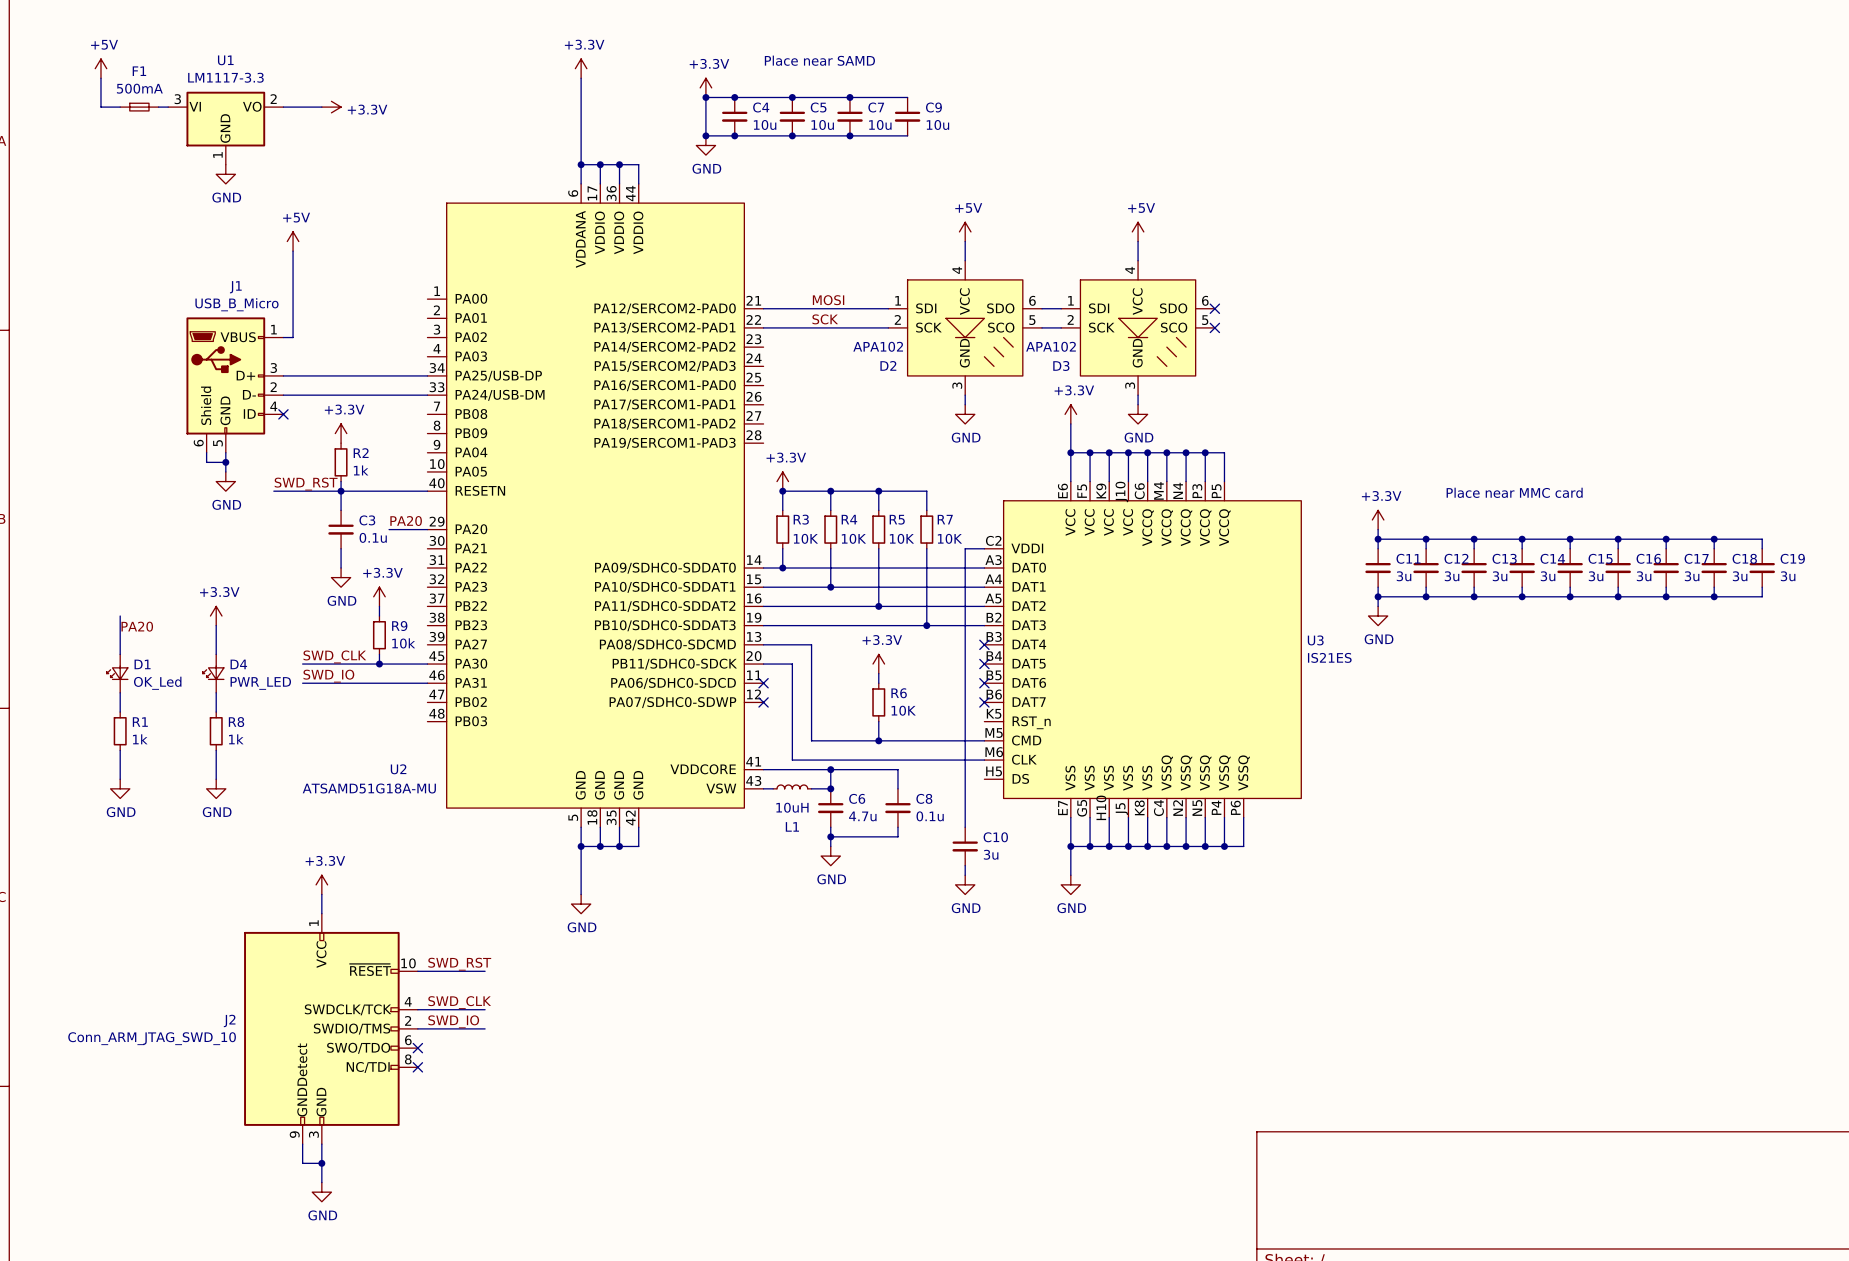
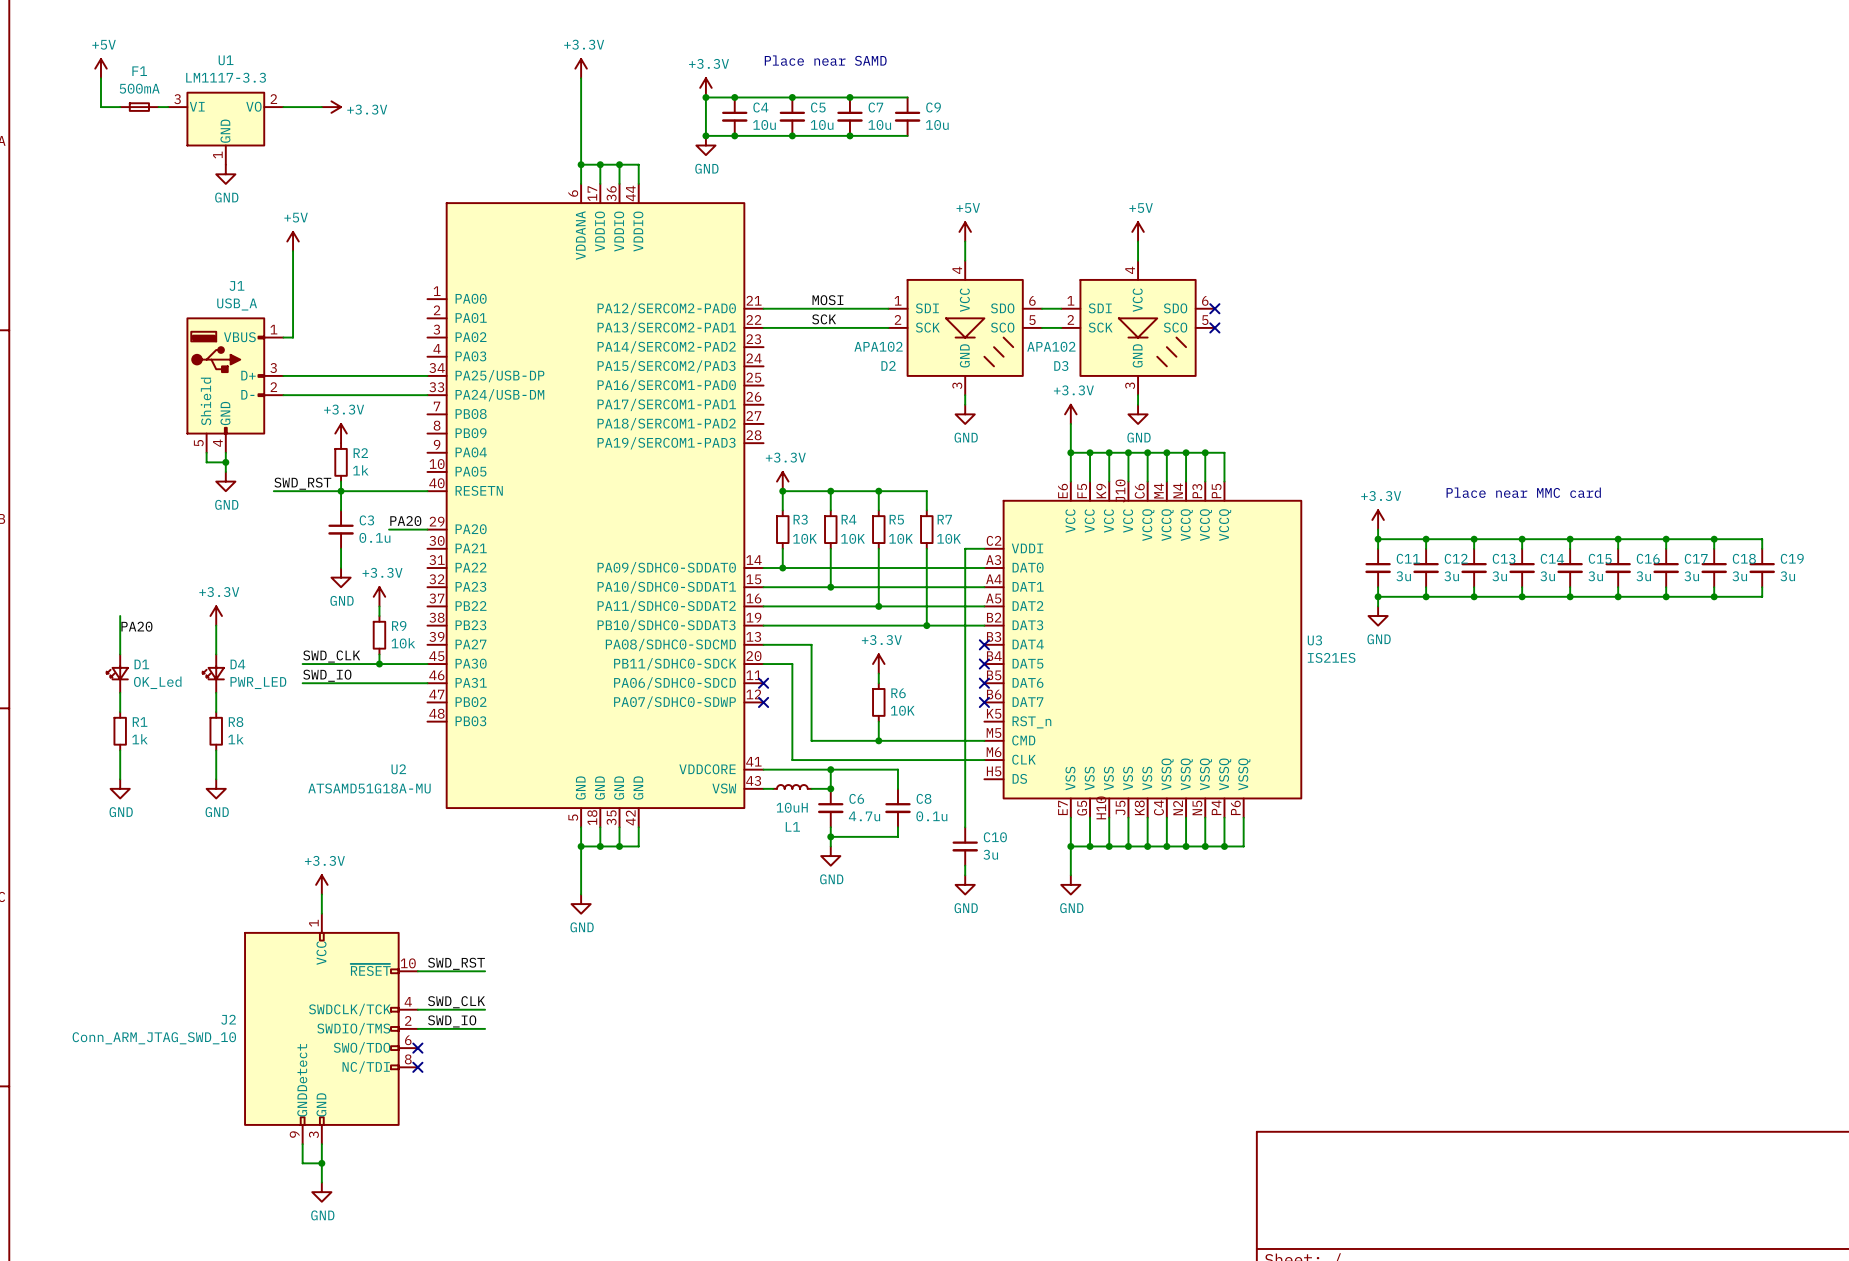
J1 value: USB_B_Micro (236, 304) -> USB_A (237, 304)
J1 symbol: [186, 317, 284, 453] -> [186, 317, 284, 453]
no-connect mark: (283, 414) -> none

